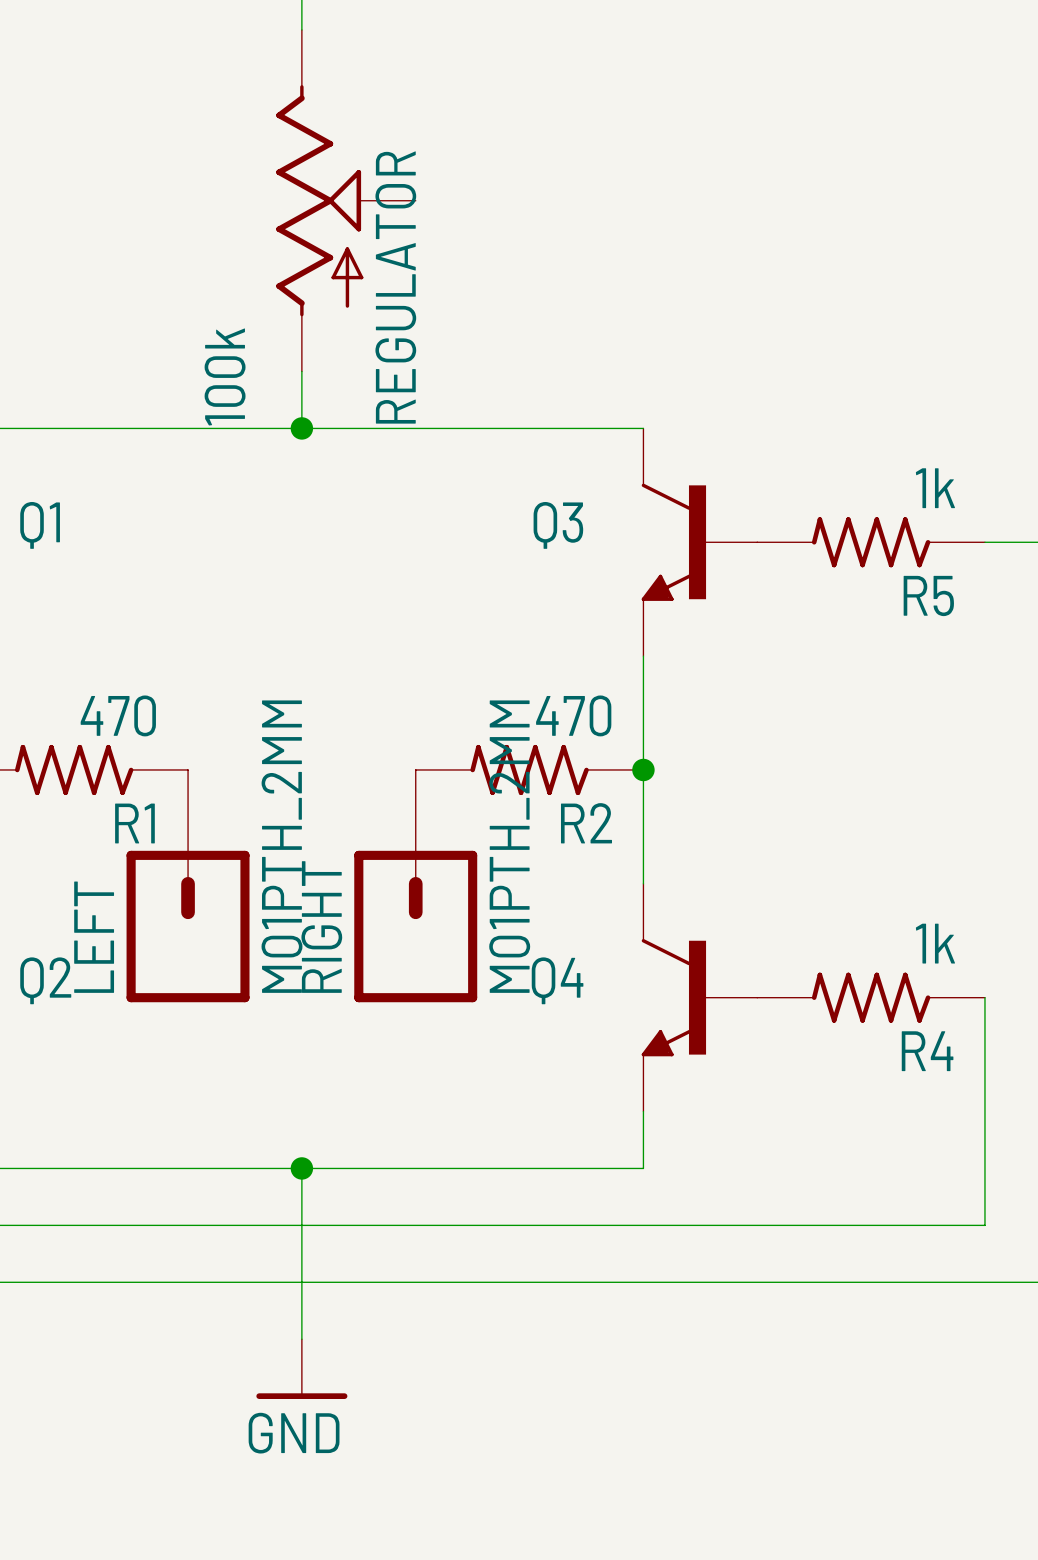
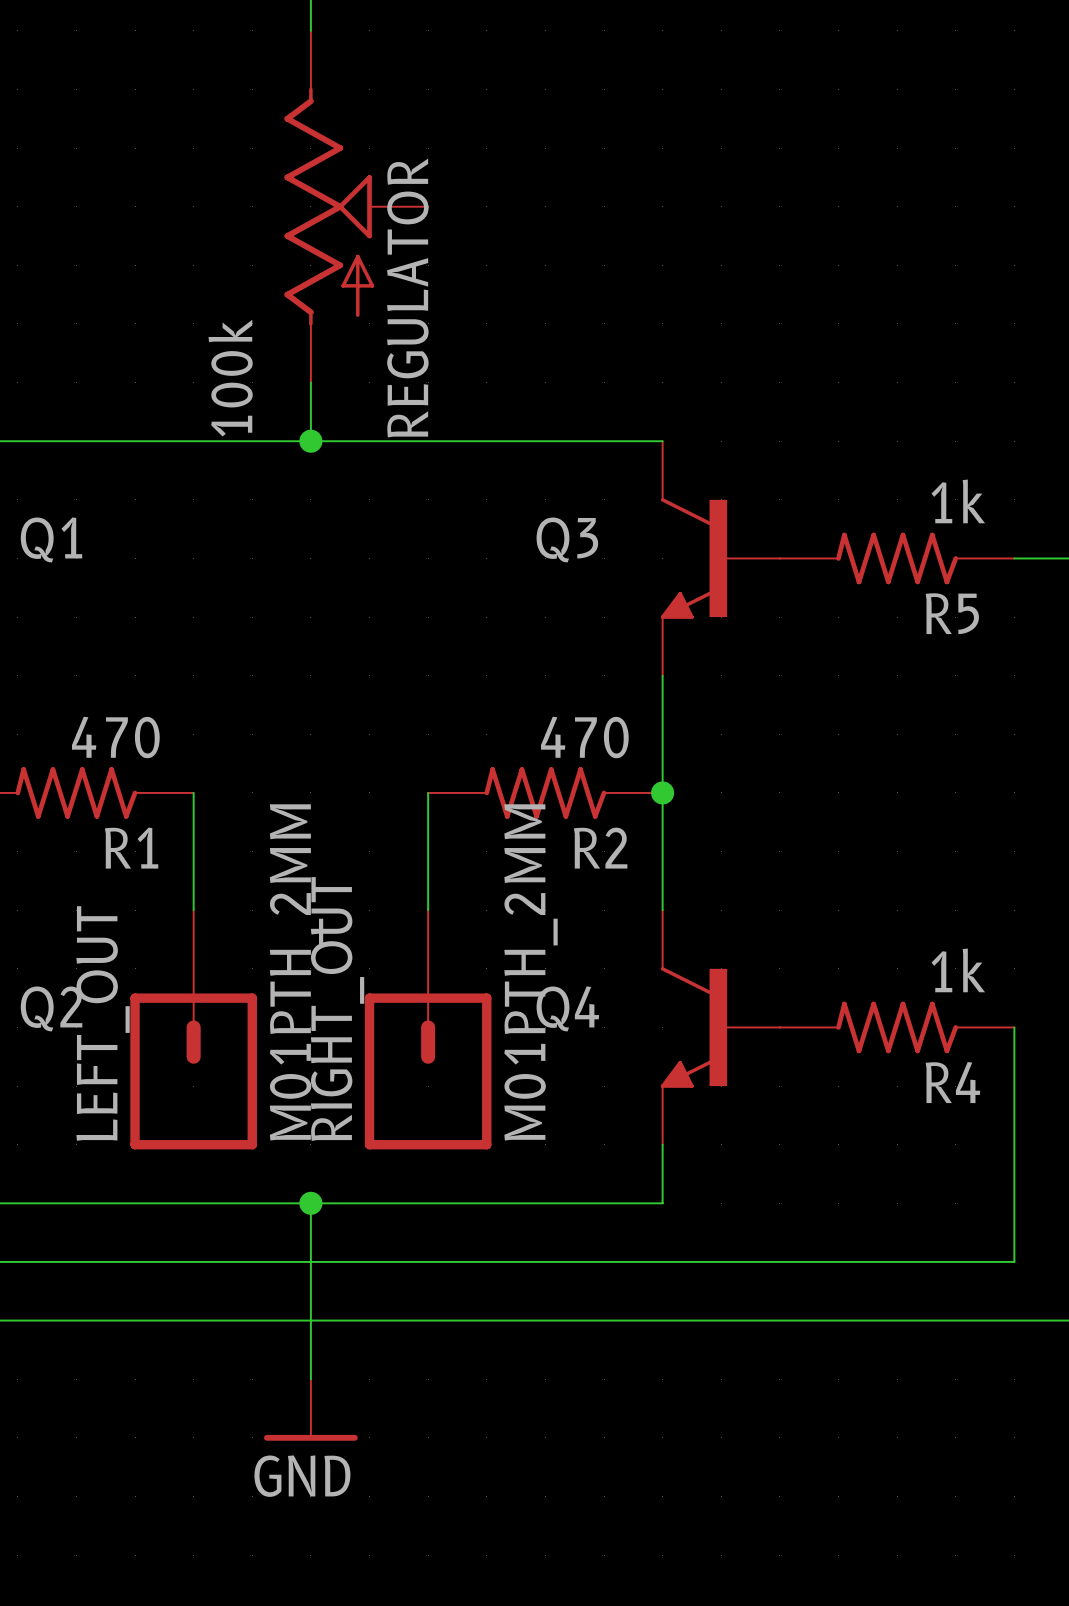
LEFT: M01PTH_2MM (188, 886) -> none
RIGHT: M01PTH_2MM (415, 886) -> none
LEFT_OUT: none -> M01PTH_2MM (193, 1029)
RIGHT_OUT: none -> M01PTH_2MM (428, 1029)

